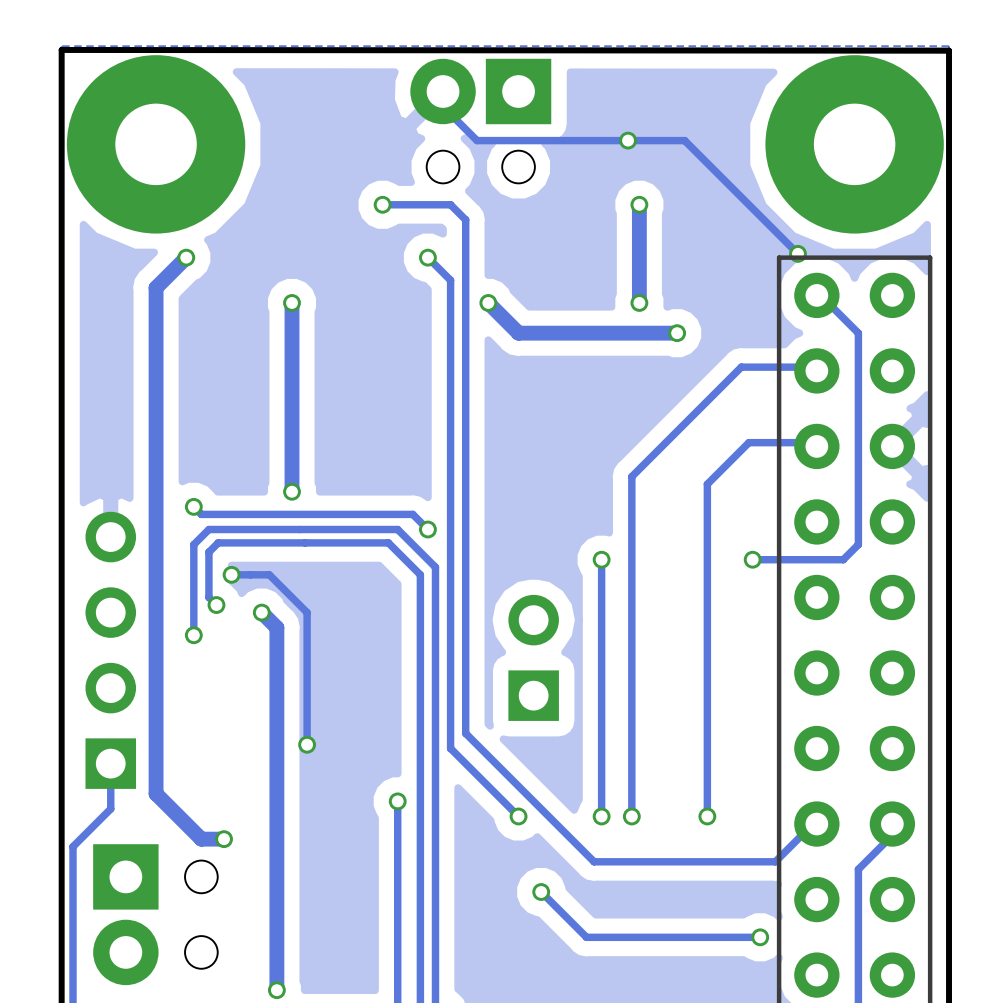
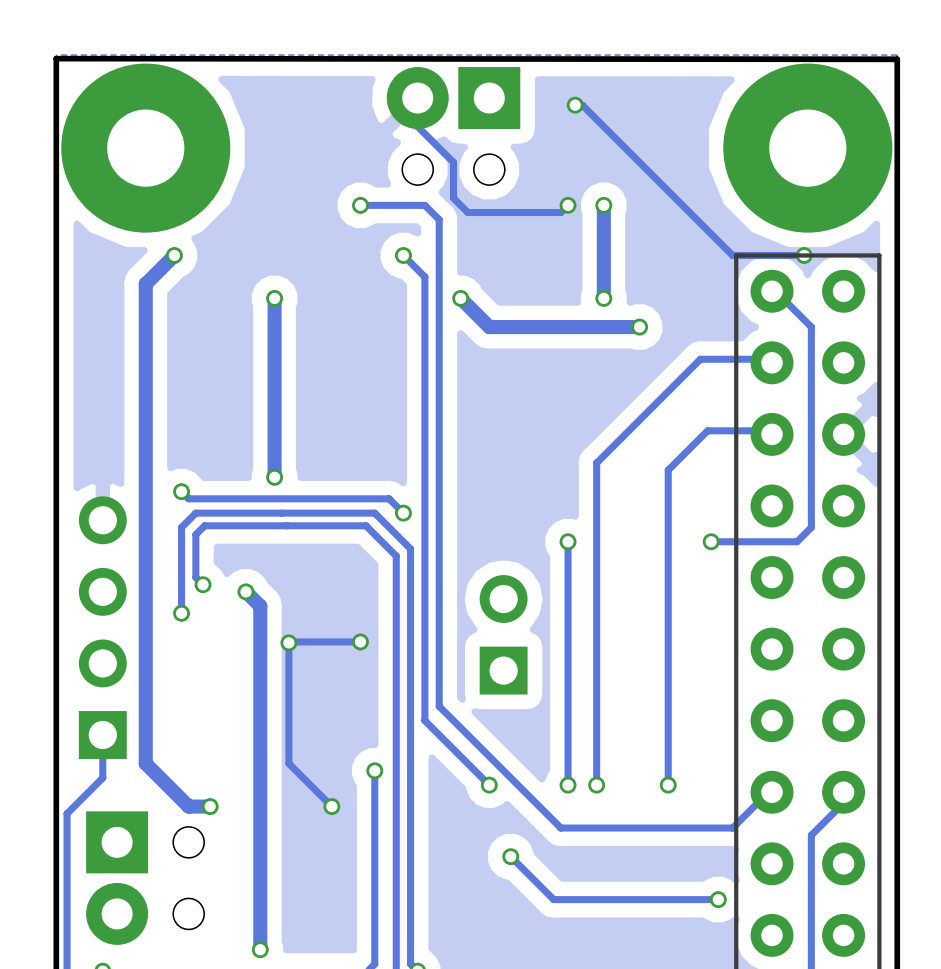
track: none -> (575, 105) (582, 105) (732, 255) (804, 255)
via: none -> (575, 105)
track: (443, 106) (477, 140) (684, 140) (797, 253) -> (417, 112) (417, 126) (453, 162) (453, 198) (467, 212) (560, 212) (568, 205)
via: (628, 140) -> none
via: none -> (568, 205)
via position: (797, 253) -> (804, 255)
track: (231, 574) (269, 574) (307, 612) (307, 666) -> (360, 641) (288, 642)
via: (231, 574) -> none
via: none -> (360, 641)
via: none -> (288, 642)
track: none -> (288, 717) (288, 763) (331, 806)
via: (307, 744) -> none
via: none -> (331, 806)

